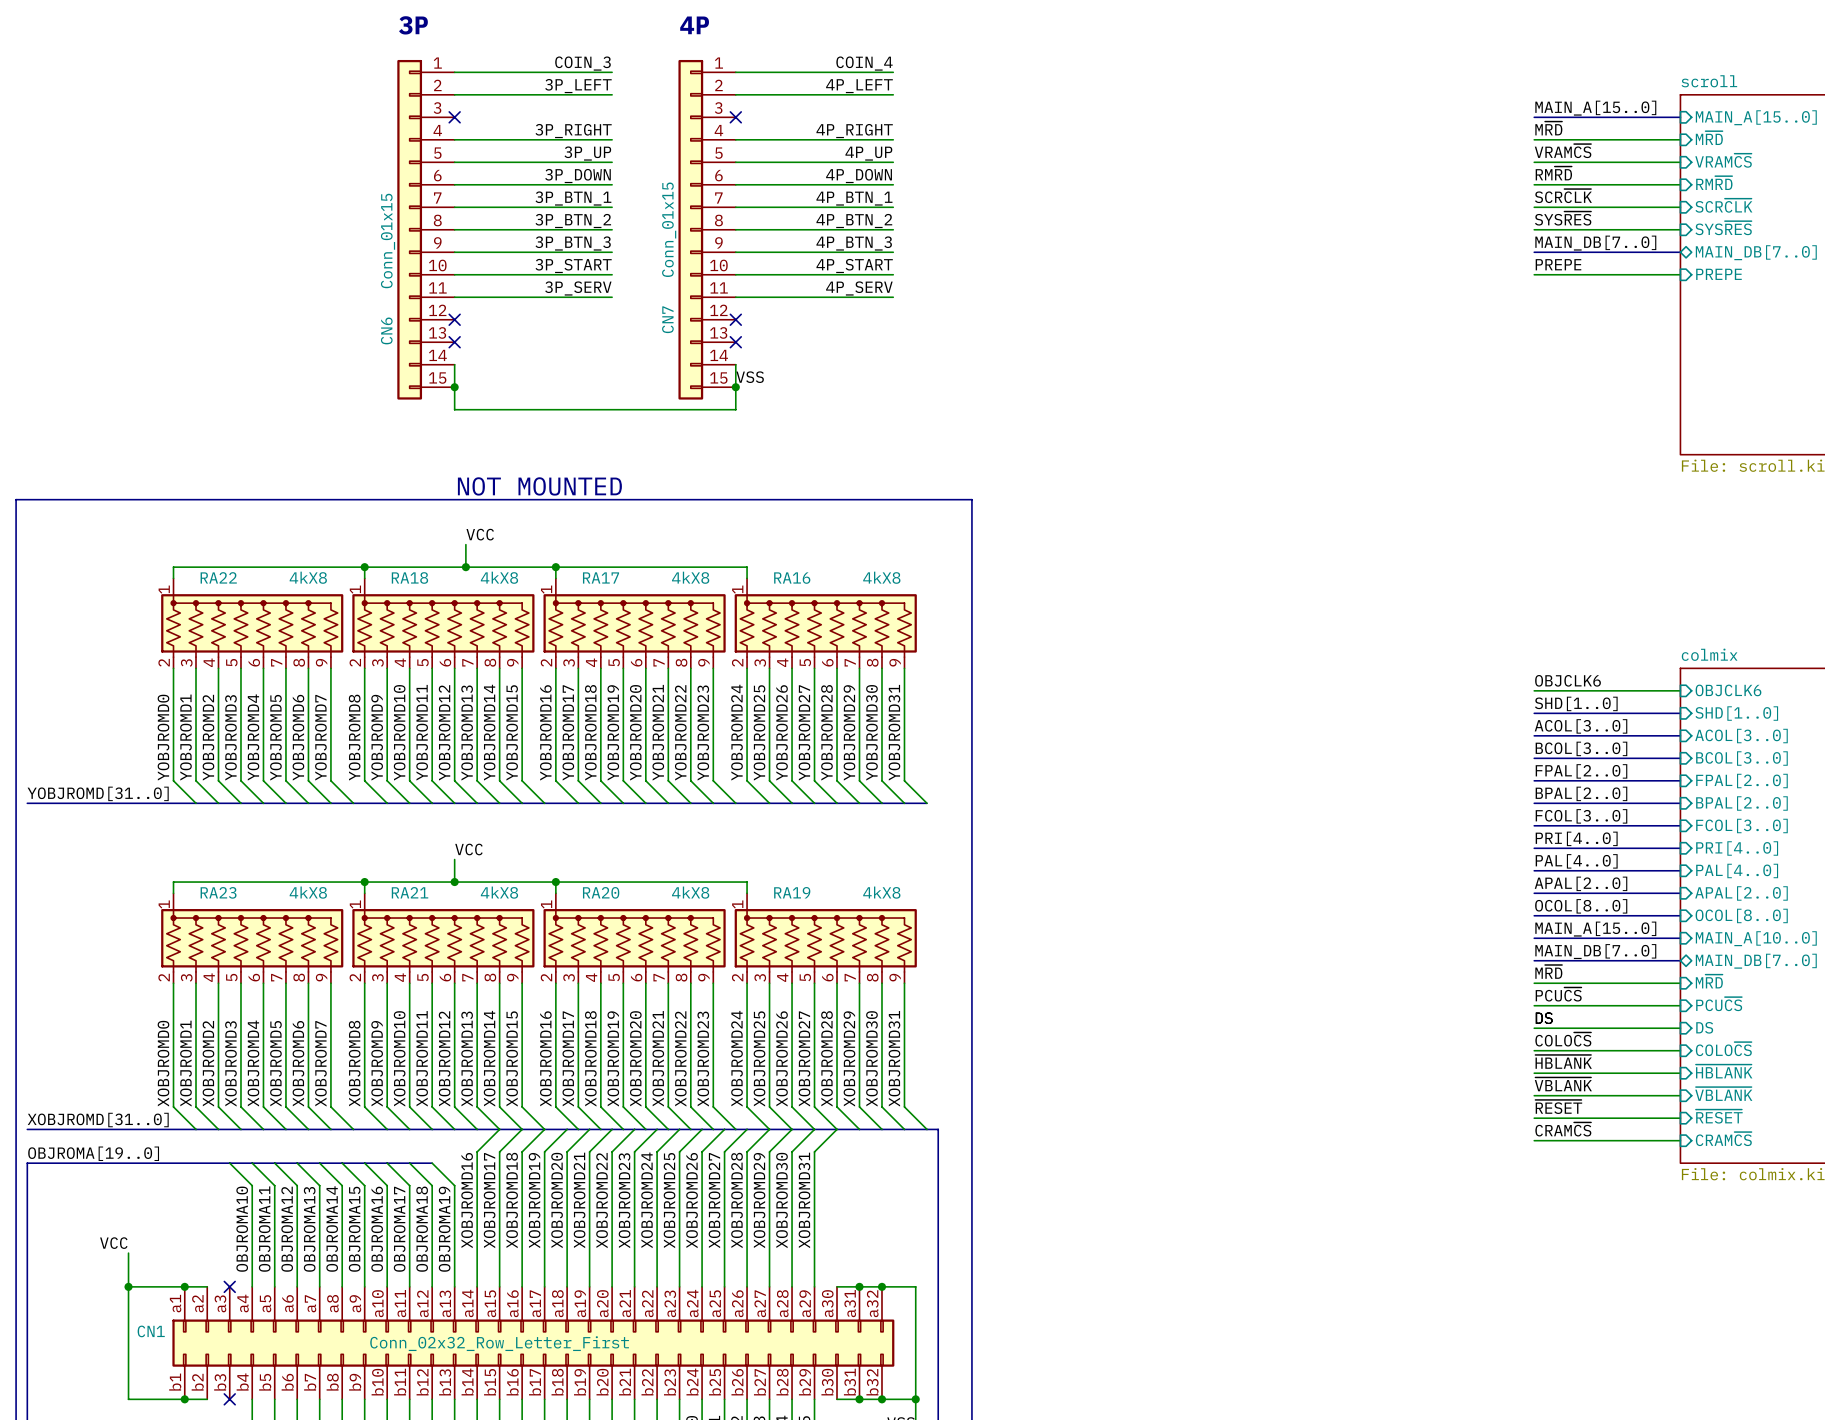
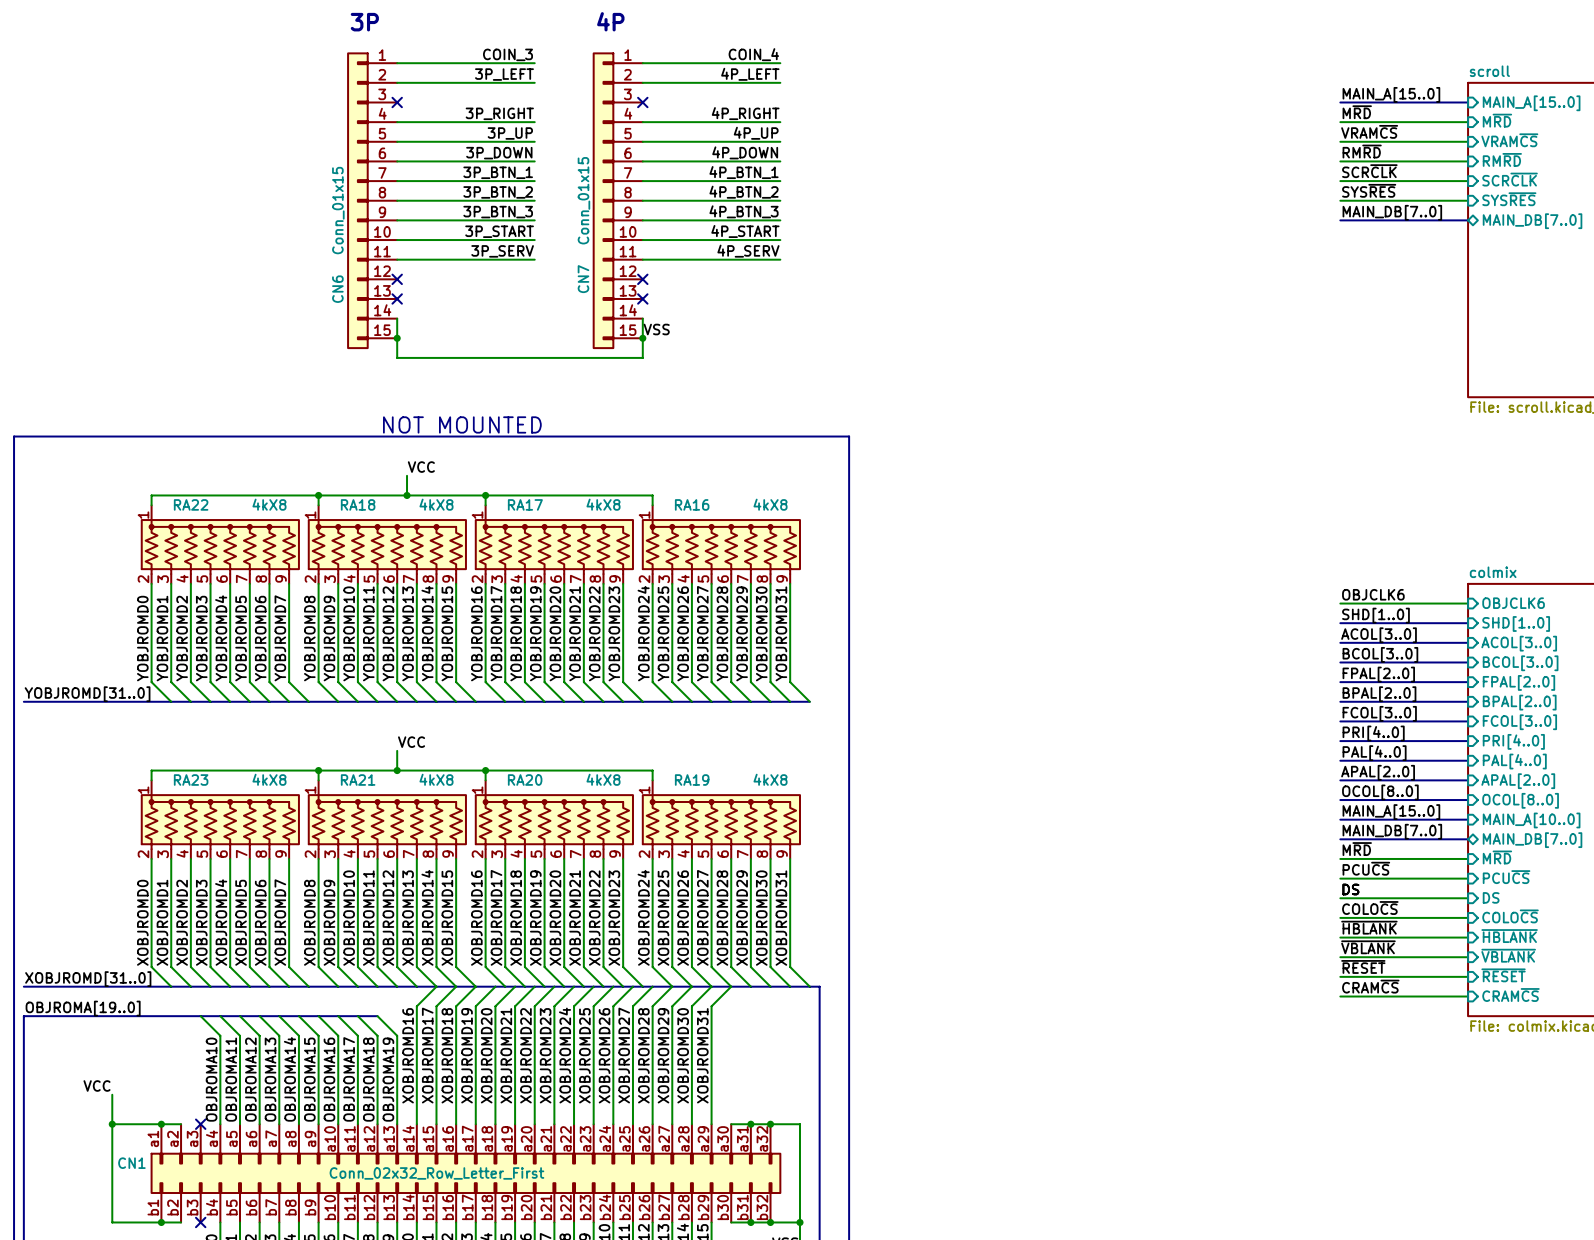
label: PREPE (1558, 264) -> none
wire: (1534, 274) (1680, 274) -> none
sheet pin: PREPE (1718, 274) -> none

